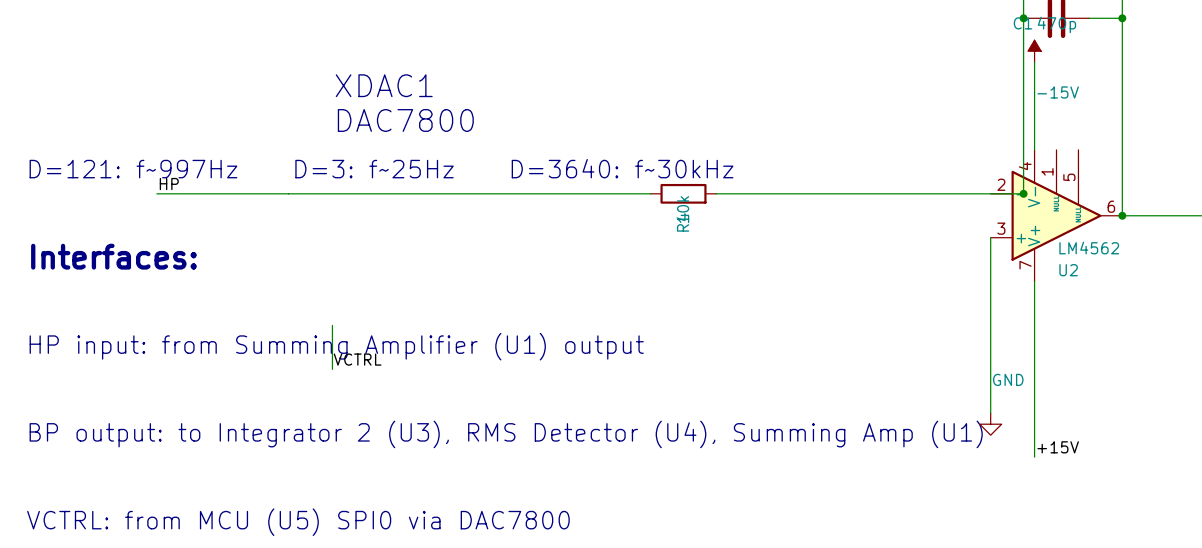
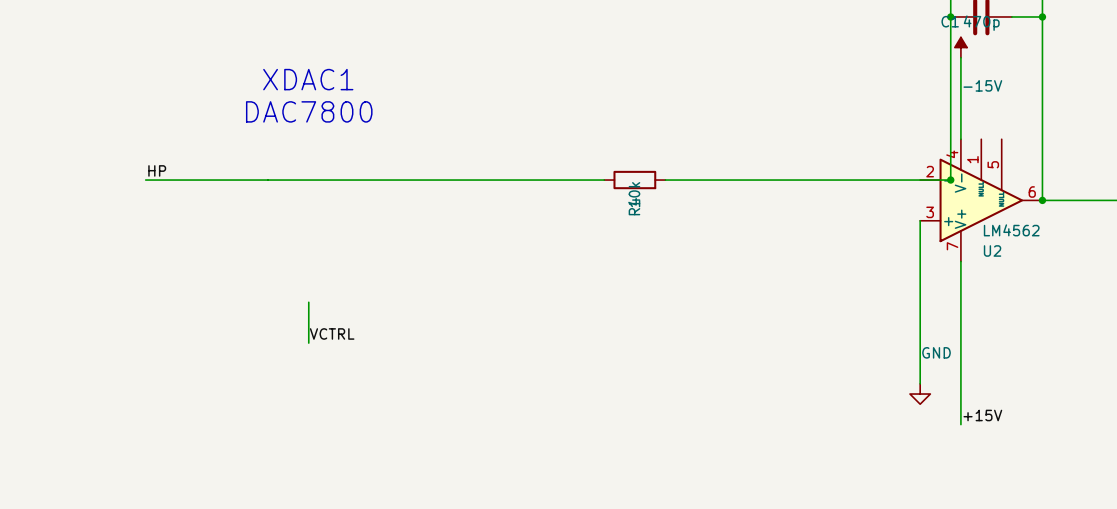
text position: XDAC1 (384, 85) -> XDAC1 (308, 79)
text position: DAC7800 (405, 120) -> DAC7800 (309, 111)
text: D=121: f~997Hz D=3: f~25Hz D=3640: f~30kHz (381, 168) -> none
text: Interfaces: (113, 256) -> none
text: HP input: from Summing Amplifier (U1) output (336, 346) -> none
text: BP output: to Integrator 2 (U3), RMS Detector (U4), Summing Amp (U1) (506, 434) -> none
text: VCTRL: from MCU (U5) SPI0 via DAC7800 (298, 522) -> none

